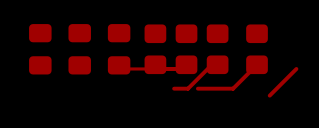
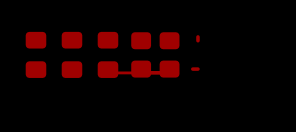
part: (217, 49) -> none
part: (257, 49) -> none
top track: (211, 64) (188, 88) (174, 88) -> none
top track: (257, 64) (233, 88) (197, 88) -> none
top track: (296, 68) (269, 95) -> none

